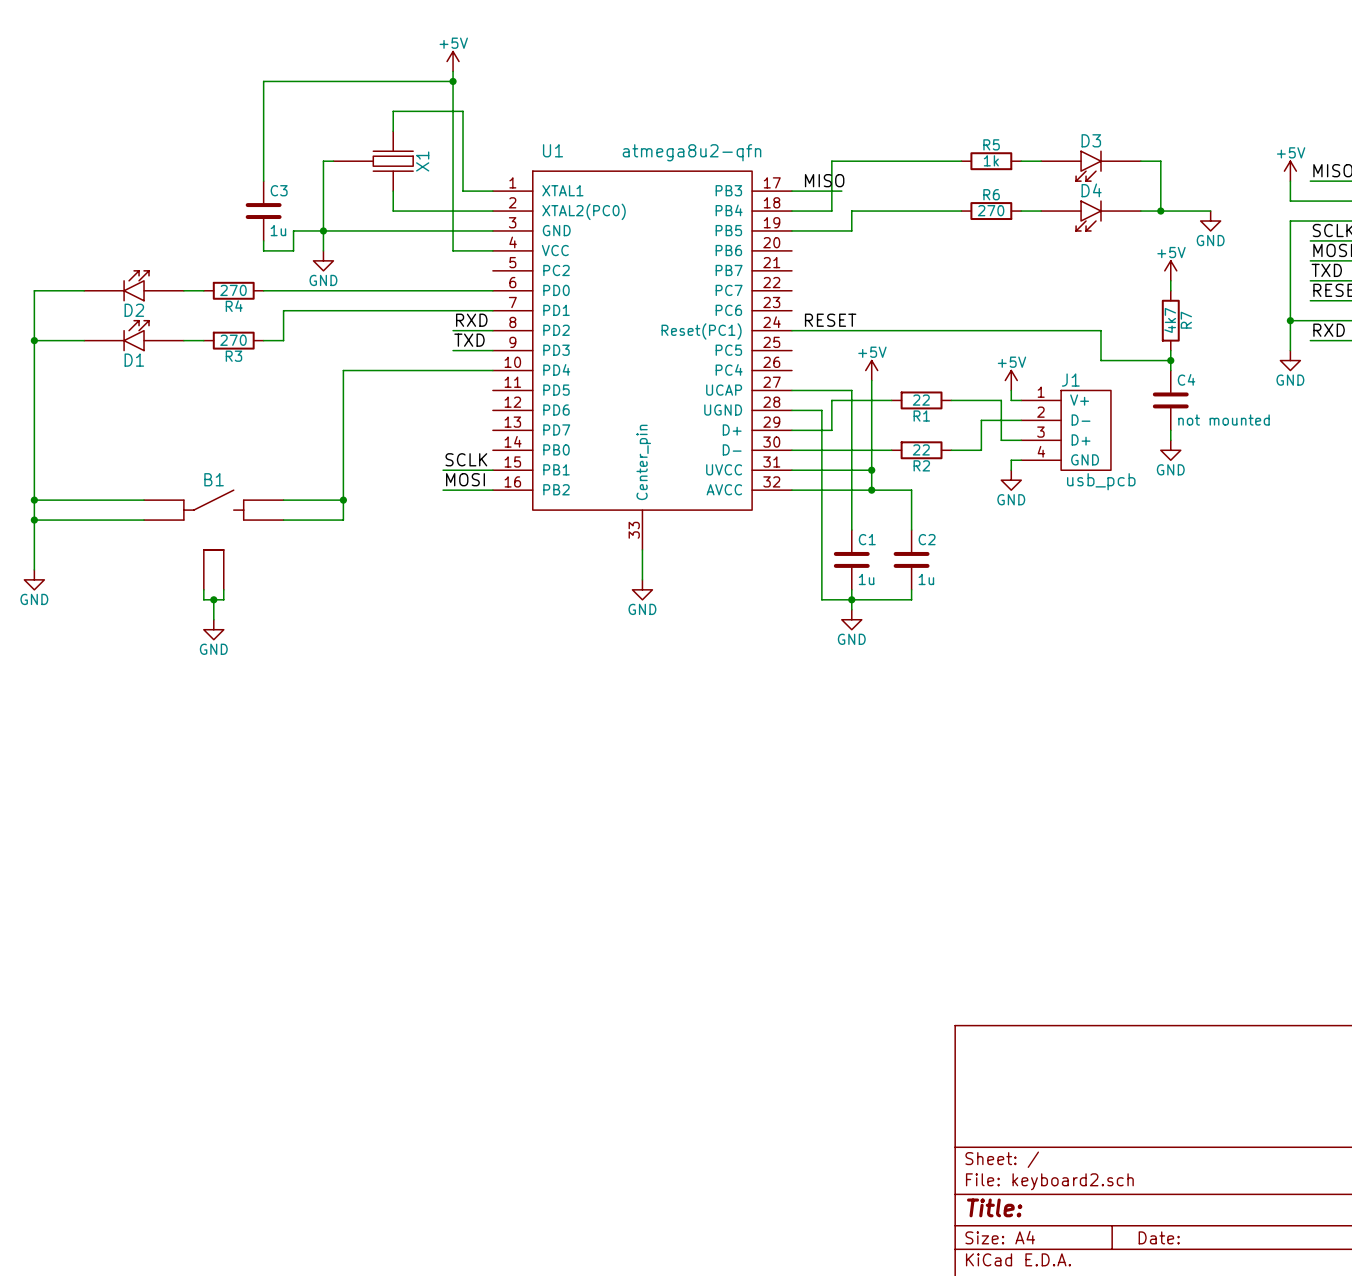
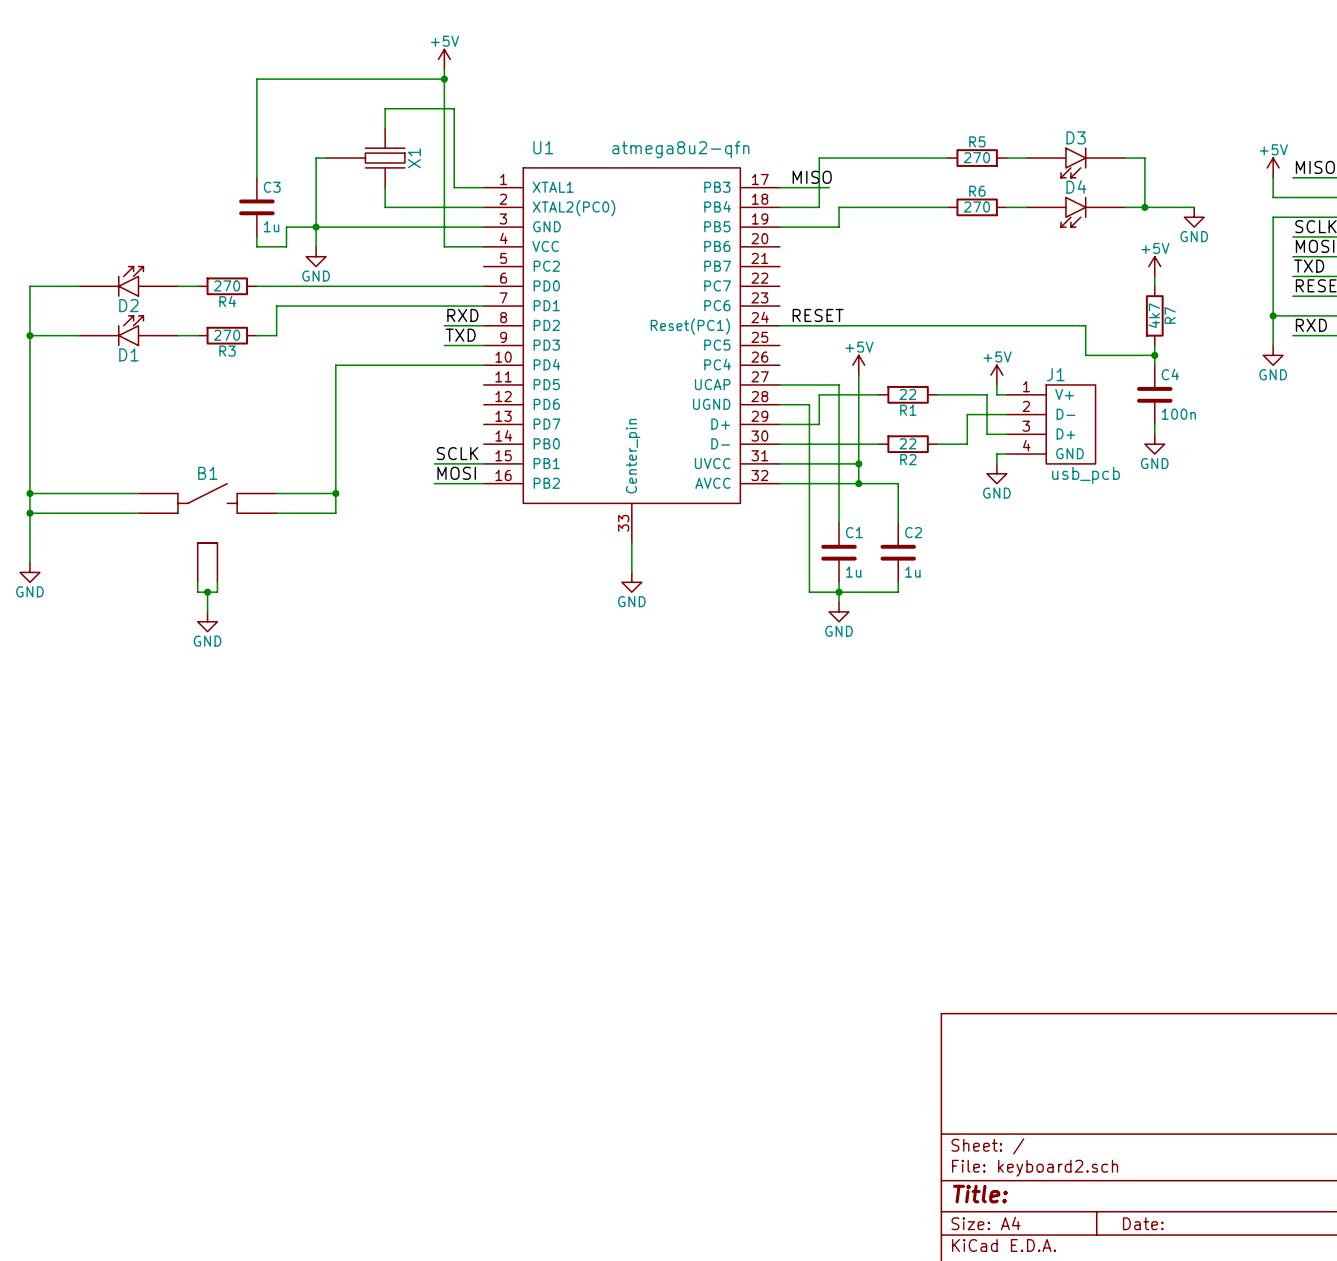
R5 value: 1k (991, 160) -> 270 (976, 157)
C4 value: not mounted (1224, 420) -> 100n (1178, 414)

